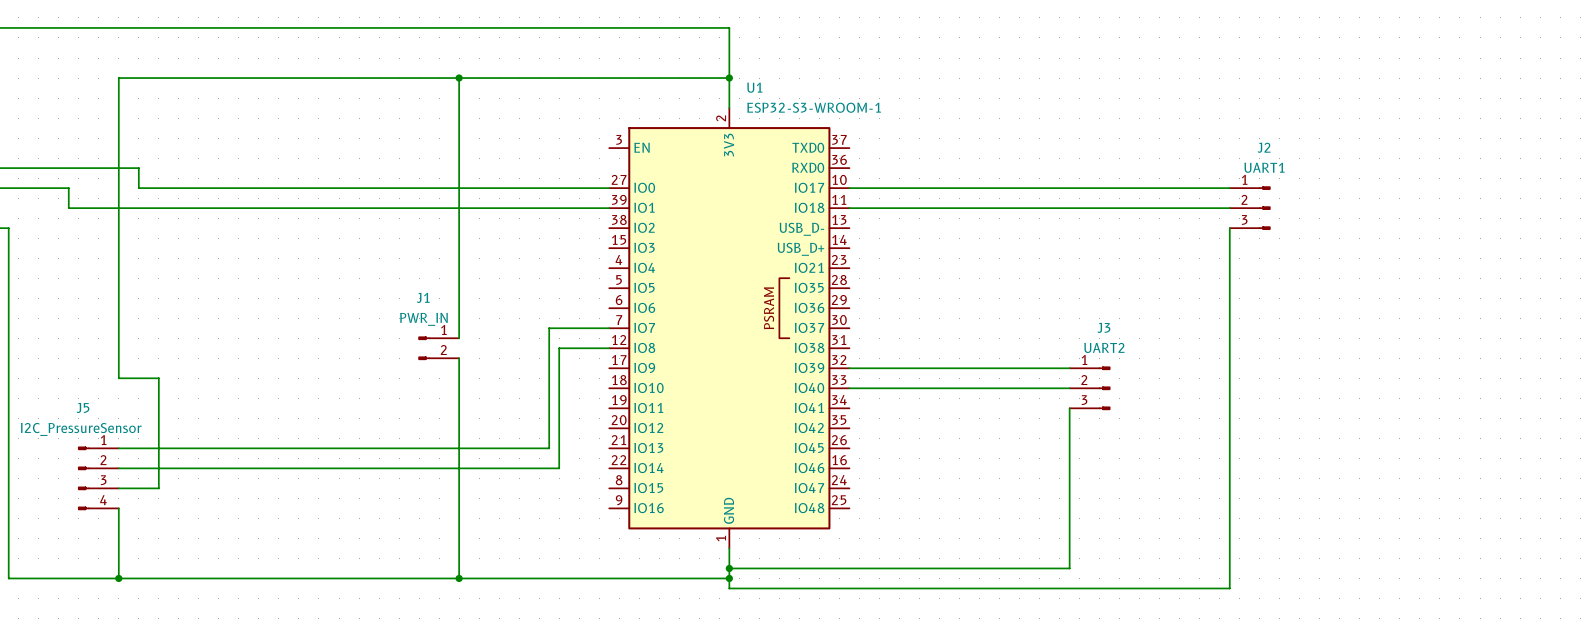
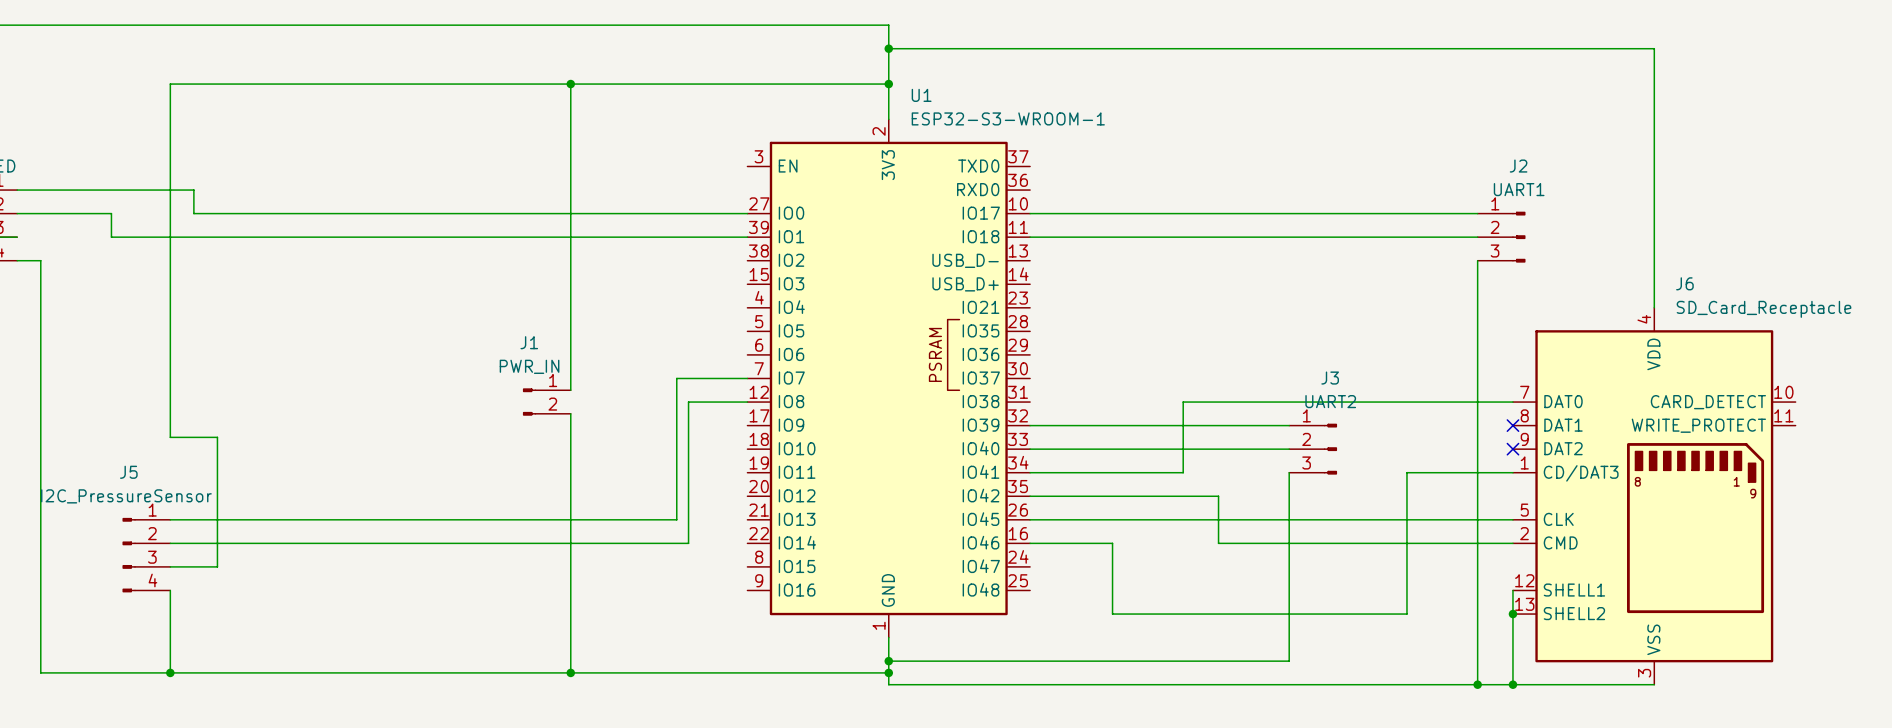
wire: none -> (888, 48) (1654, 48) (1654, 307)
junction: none -> (888, 48)
wire: none -> (1512, 402) (1183, 402) (1183, 472) (1030, 472)
no-connect mark: none -> (1512, 425)
no-connect mark: none -> (1512, 449)
wire: none -> (1512, 472) (1406, 472) (1406, 614) (1112, 614) (1112, 543) (1030, 543)
wire: none -> (1030, 496) (1218, 496) (1218, 543) (1512, 543)
J6: none -> SD_Card_Receptacle (1654, 496)
wire: none -> (1030, 519) (1512, 519)
wire: none -> (1512, 590) (1512, 684)
junction: none -> (1512, 614)
wire: none -> (1477, 684) (1654, 684)
junction: none -> (1477, 684)
junction: none -> (1512, 684)

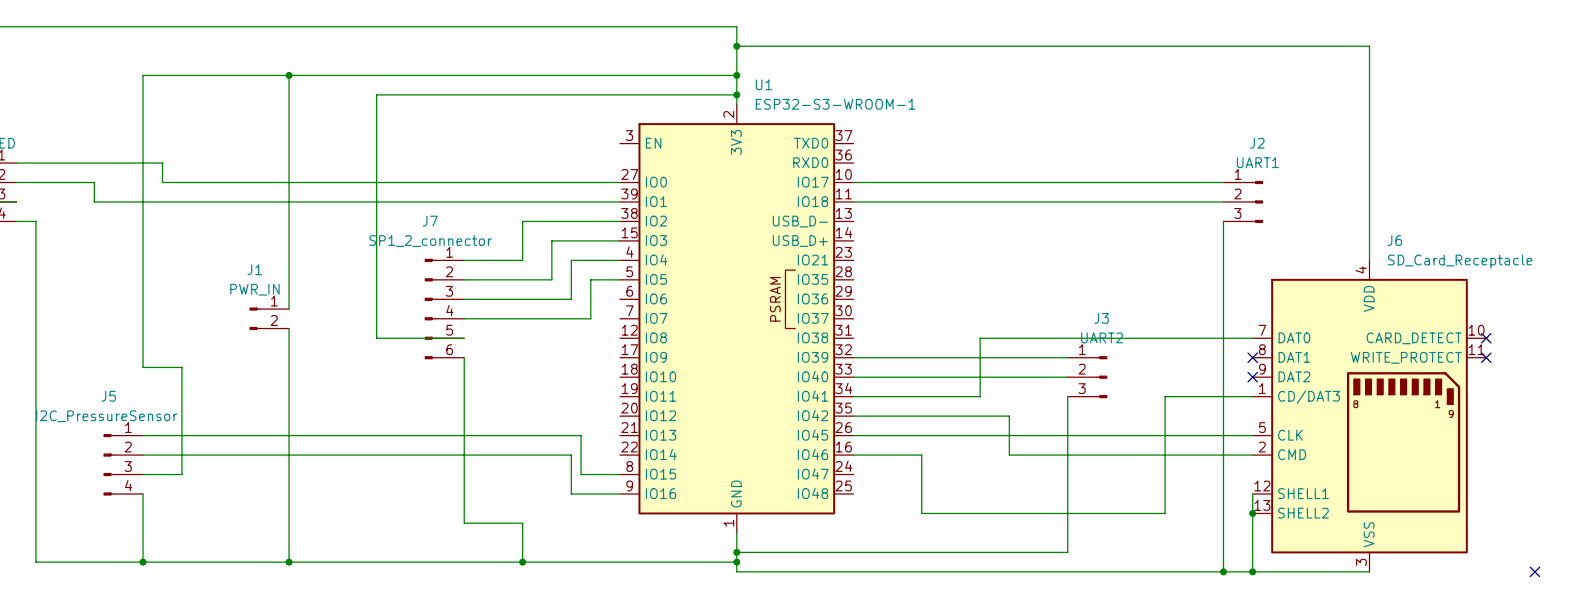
wire: none -> (289, 75) (289, 309)
junction: none -> (289, 75)
wire: (570, 84) (570, 390) -> none
junction: (570, 84) -> none
wire: none -> (736, 94) (376, 94) (376, 338) (464, 338)
junction: none -> (736, 94)
wire: none -> (619, 221) (522, 221) (522, 260) (464, 260)
wire: none -> (619, 240) (551, 240) (551, 279) (464, 279)
wire: none -> (619, 260) (571, 260) (571, 299) (464, 299)
J7: none -> SP1_2_connector (444, 309)
wire: (676, 378) (676, 519) -> (561, 318) (464, 318)
wire: (712, 378) (747, 378) -> (590, 318) (590, 279) (619, 279)
wire: none -> (289, 328) (289, 562)
J1 position: (546, 402) -> (269, 318)
wire: (747, 402) (688, 402) (688, 543) -> (619, 493) (571, 493) (571, 455)
no-connect mark: none -> (1486, 338)
wire: (570, 413) (570, 672) -> none
wire: none -> (464, 357) (464, 523) (522, 523) (522, 562)
no-connect mark: none -> (1486, 357)
wire: none -> (561, 435) (581, 435) (581, 474) (619, 474)
junction: none -> (289, 562)
junction: (570, 672) -> none
junction: none -> (522, 562)
no-connect mark: none -> (1534, 571)

